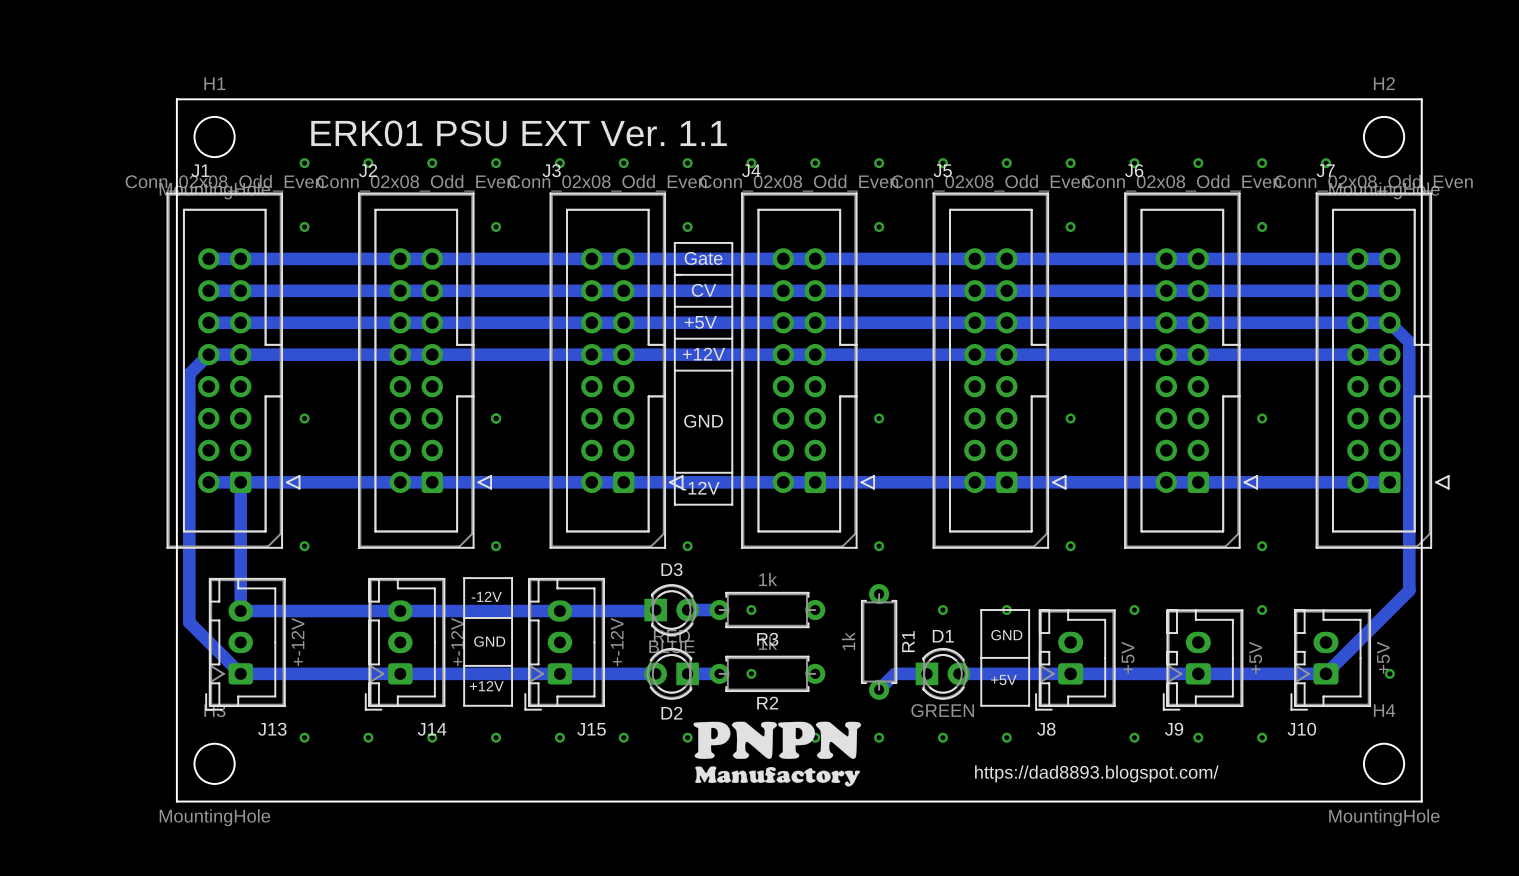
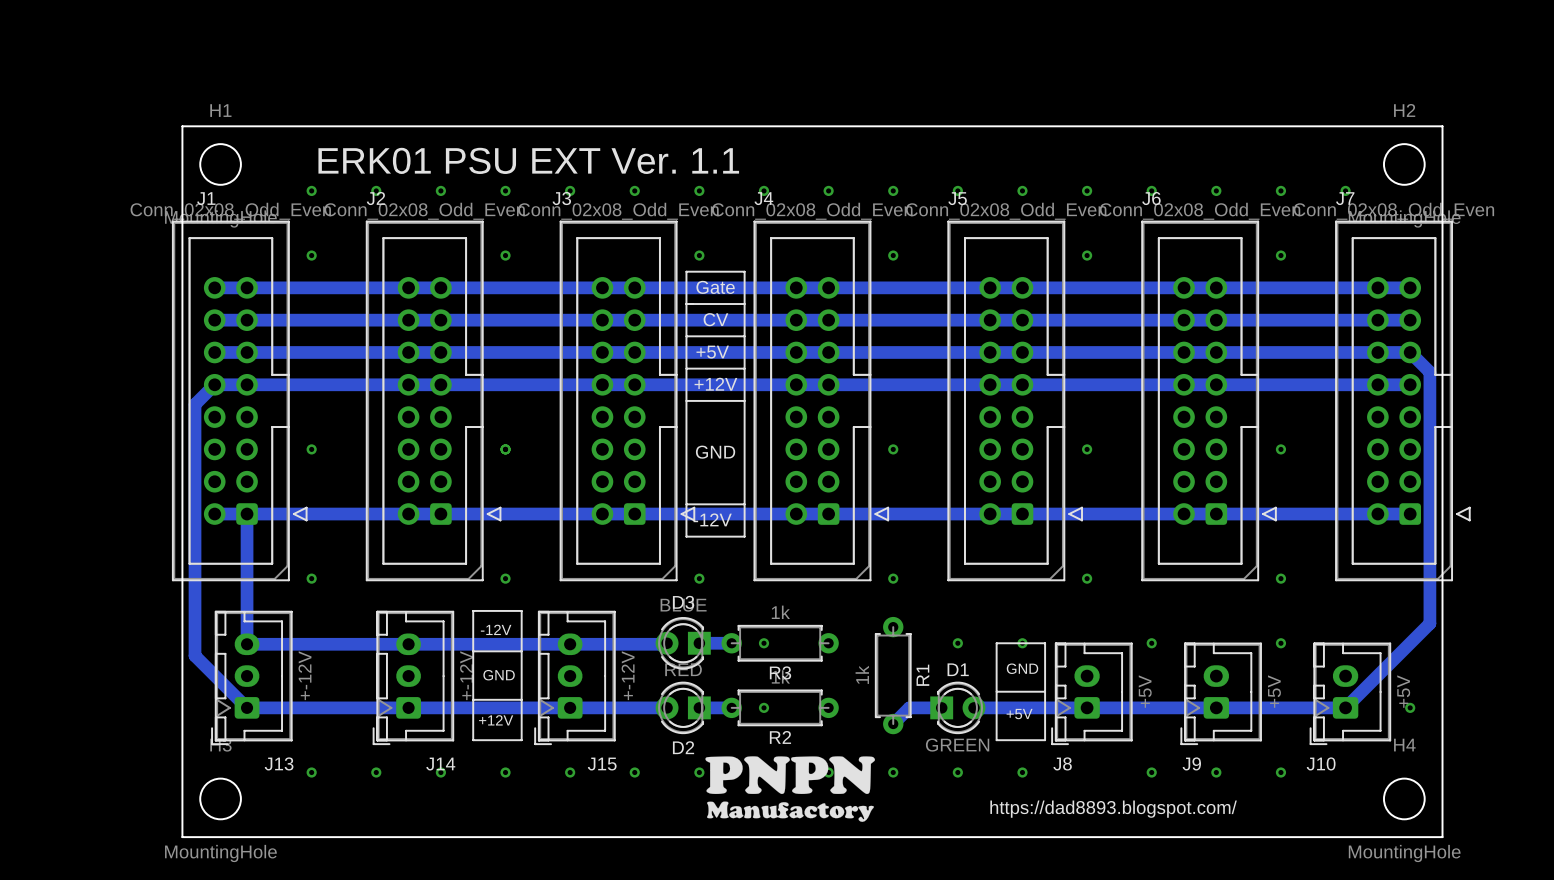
D3 rotation: 0° (671, 610) -> 180° (683, 643)

